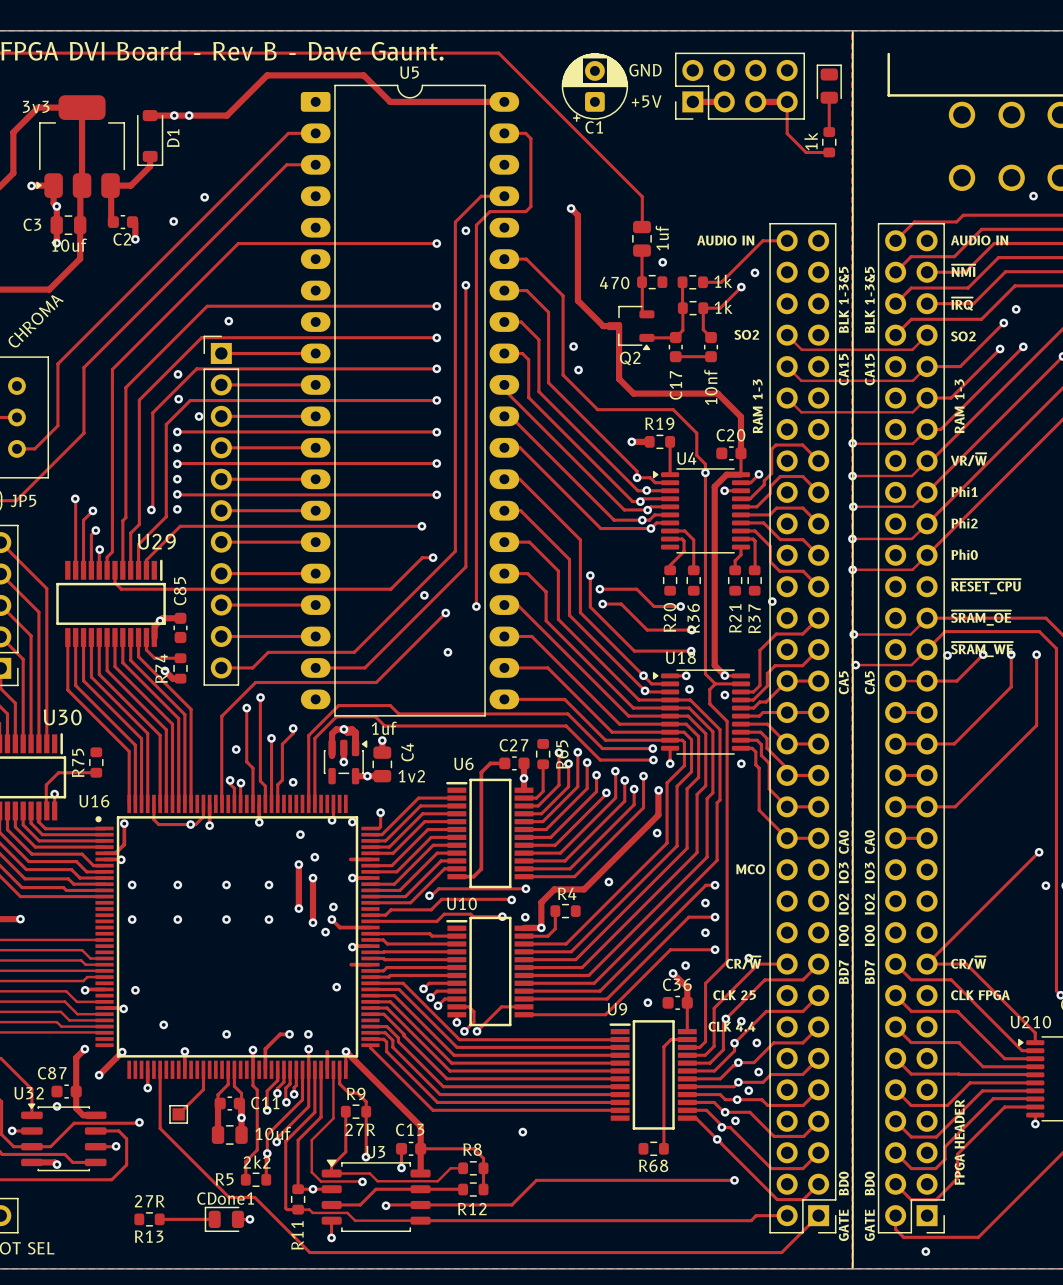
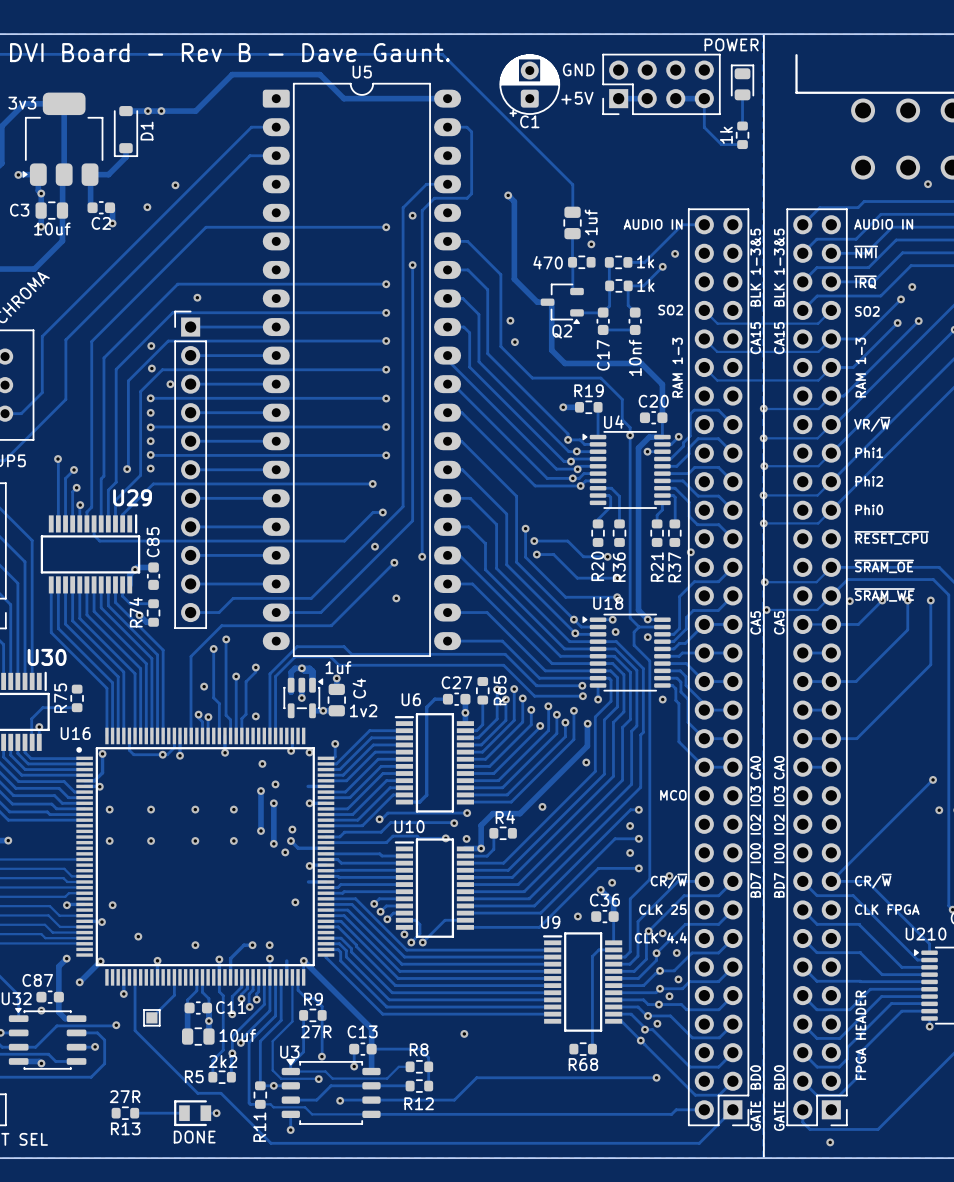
part value: none -> POWER (731, 44)
U3 name position: U3 (375, 1152) -> U3 (289, 1052)
part: none -> DONE (192, 1113)
CDone1: (224, 1219) -> none

